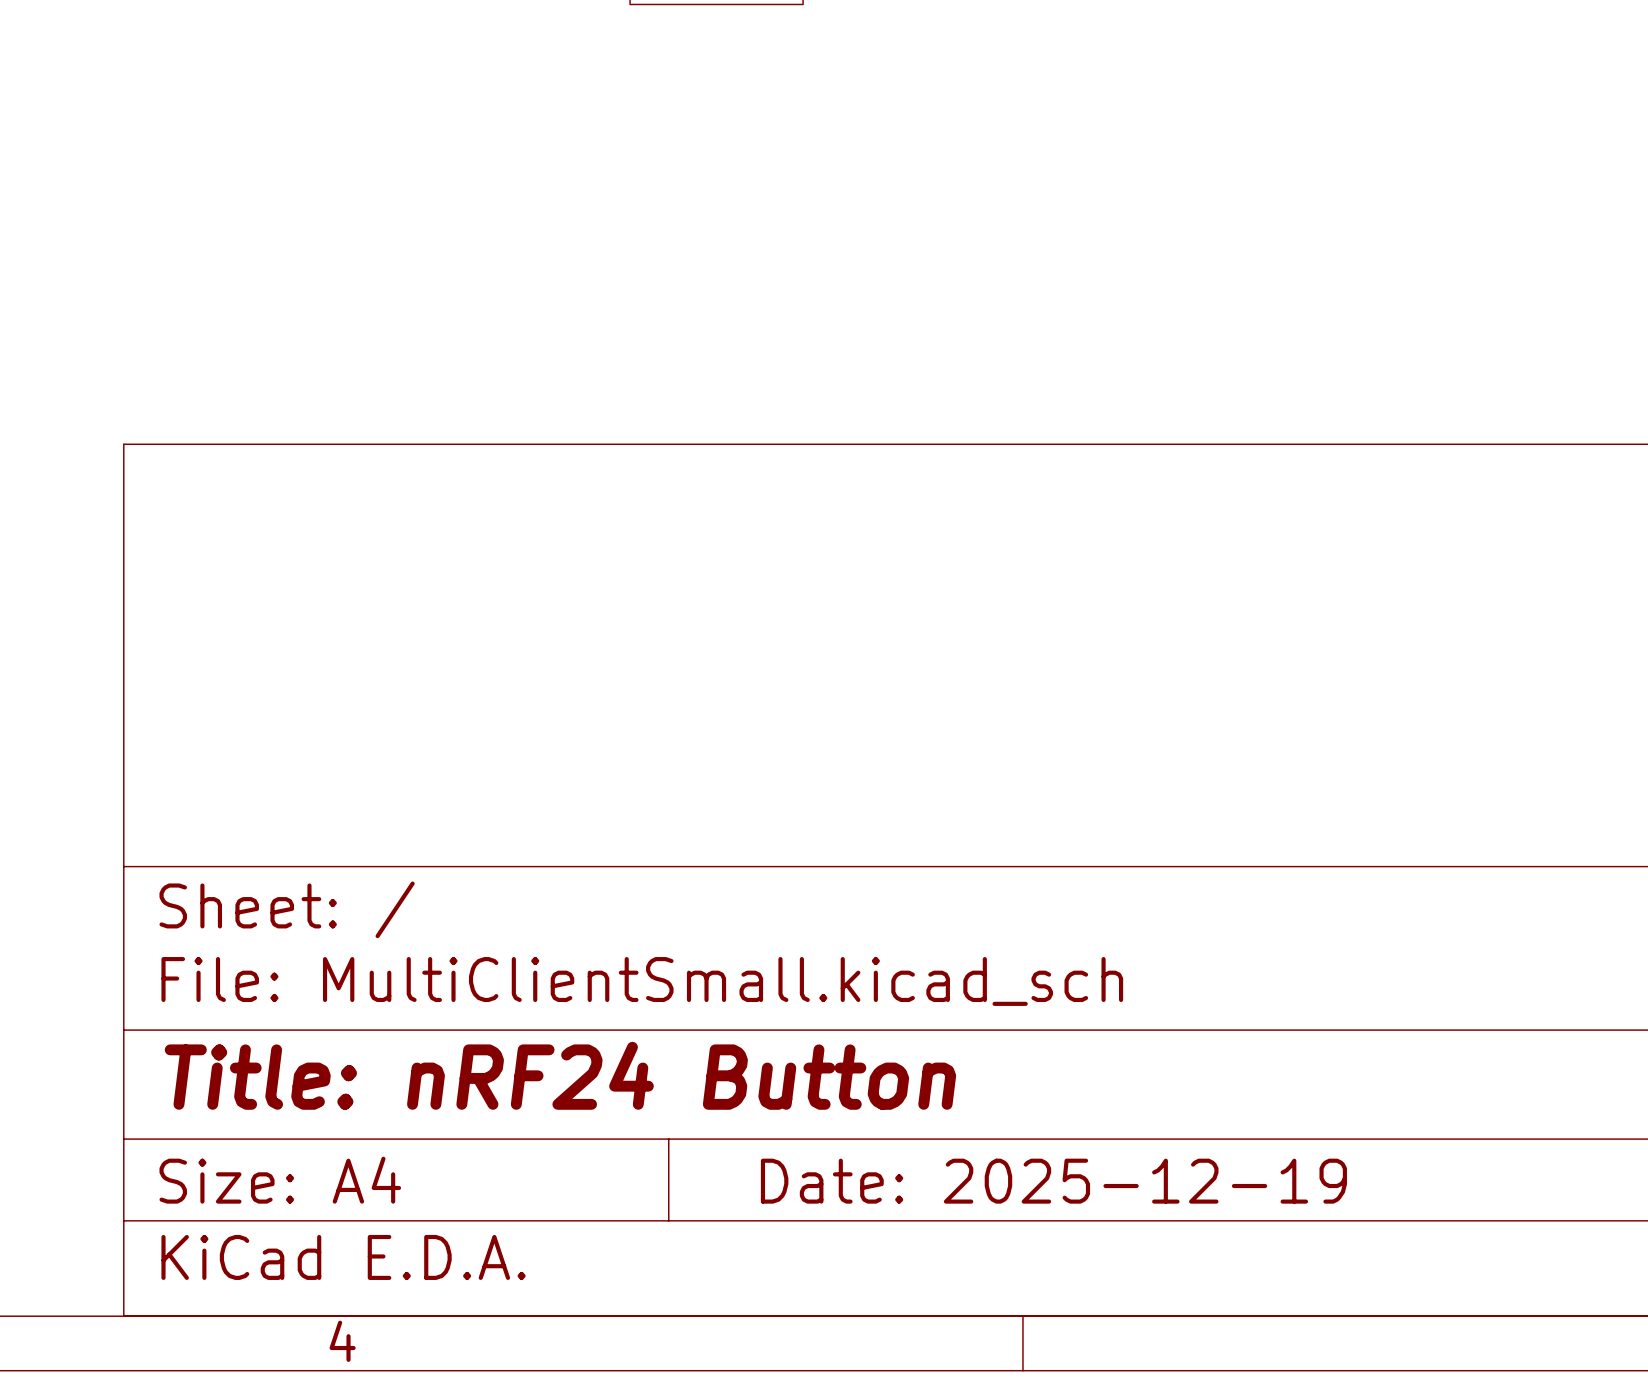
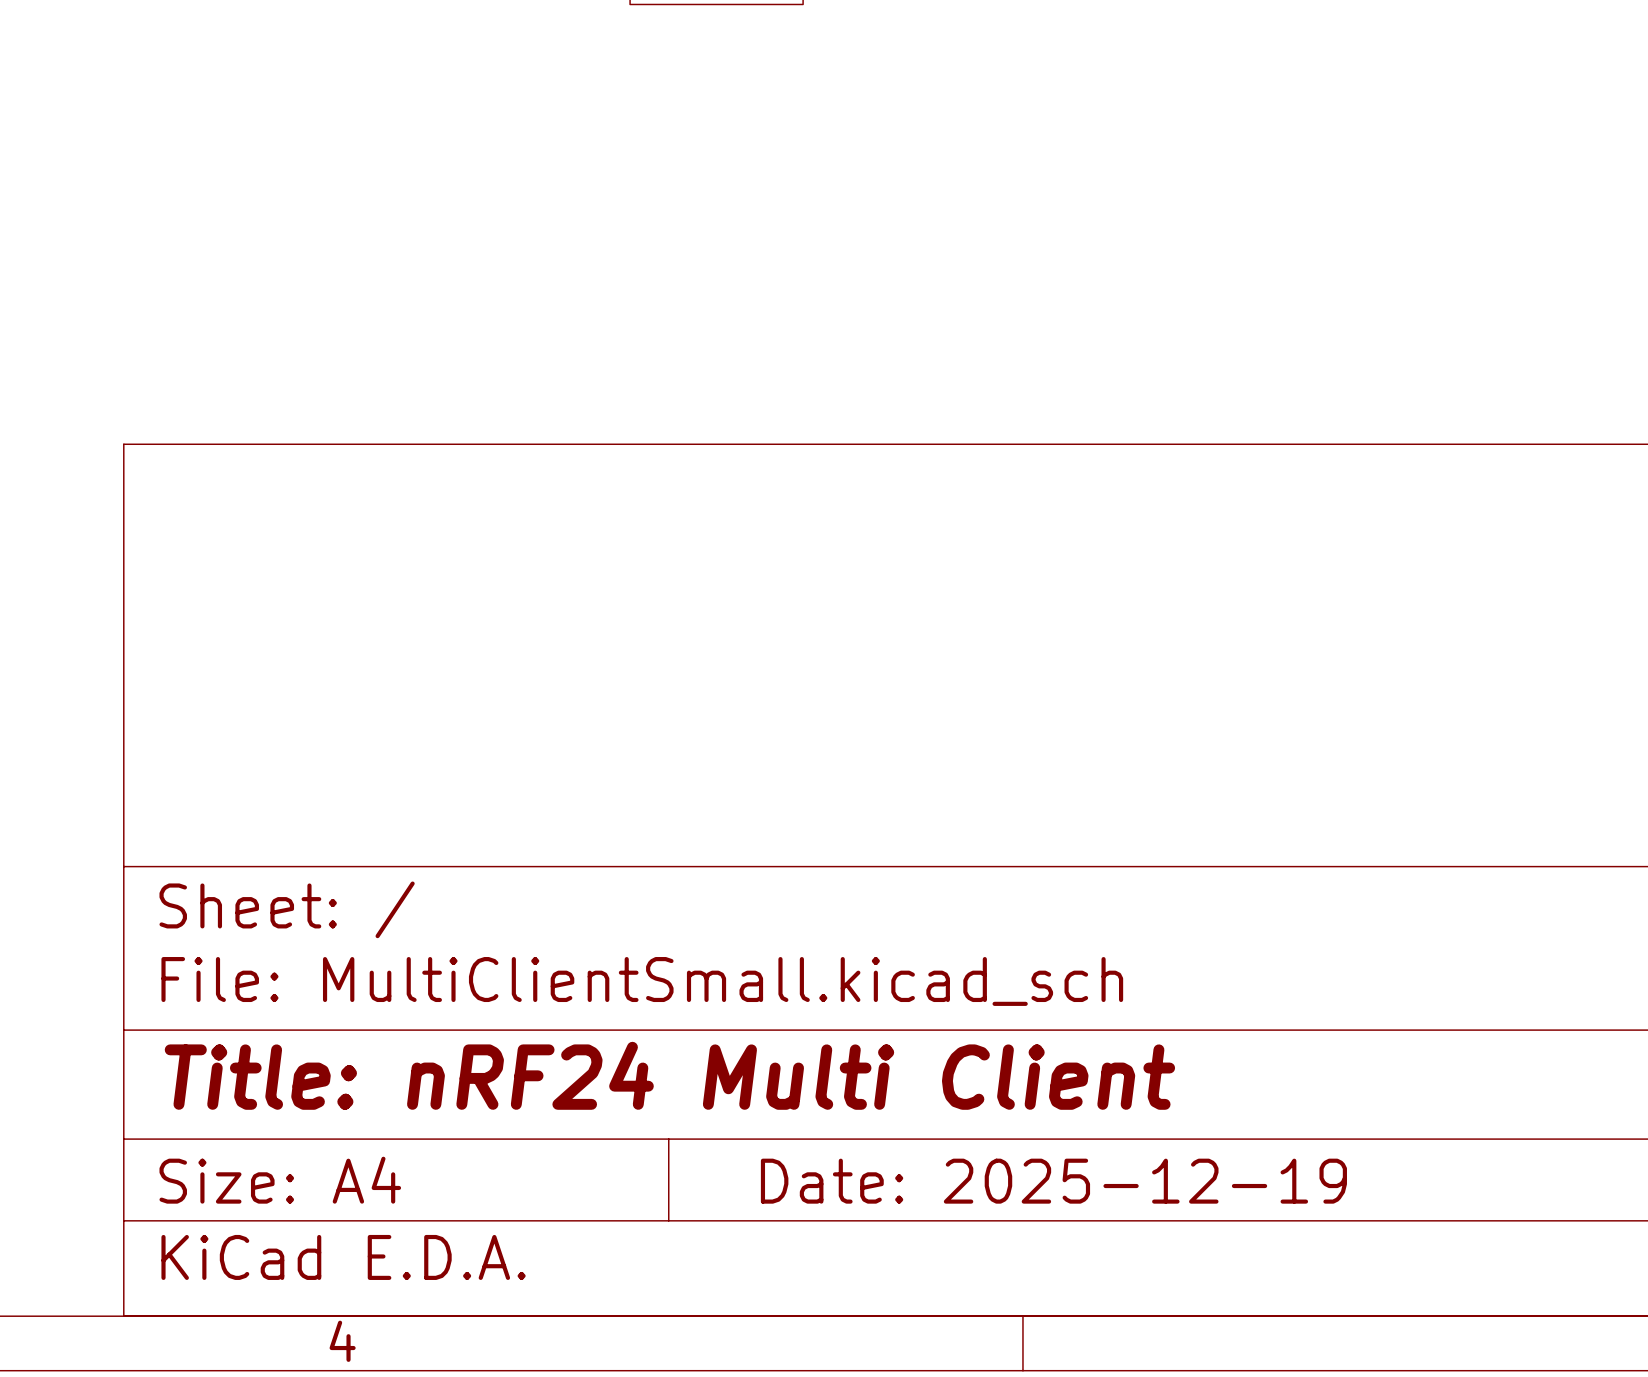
title block: Title: nRF24 Button (560, 1075) -> Title: nRF24 Multi Client (669, 1075)

